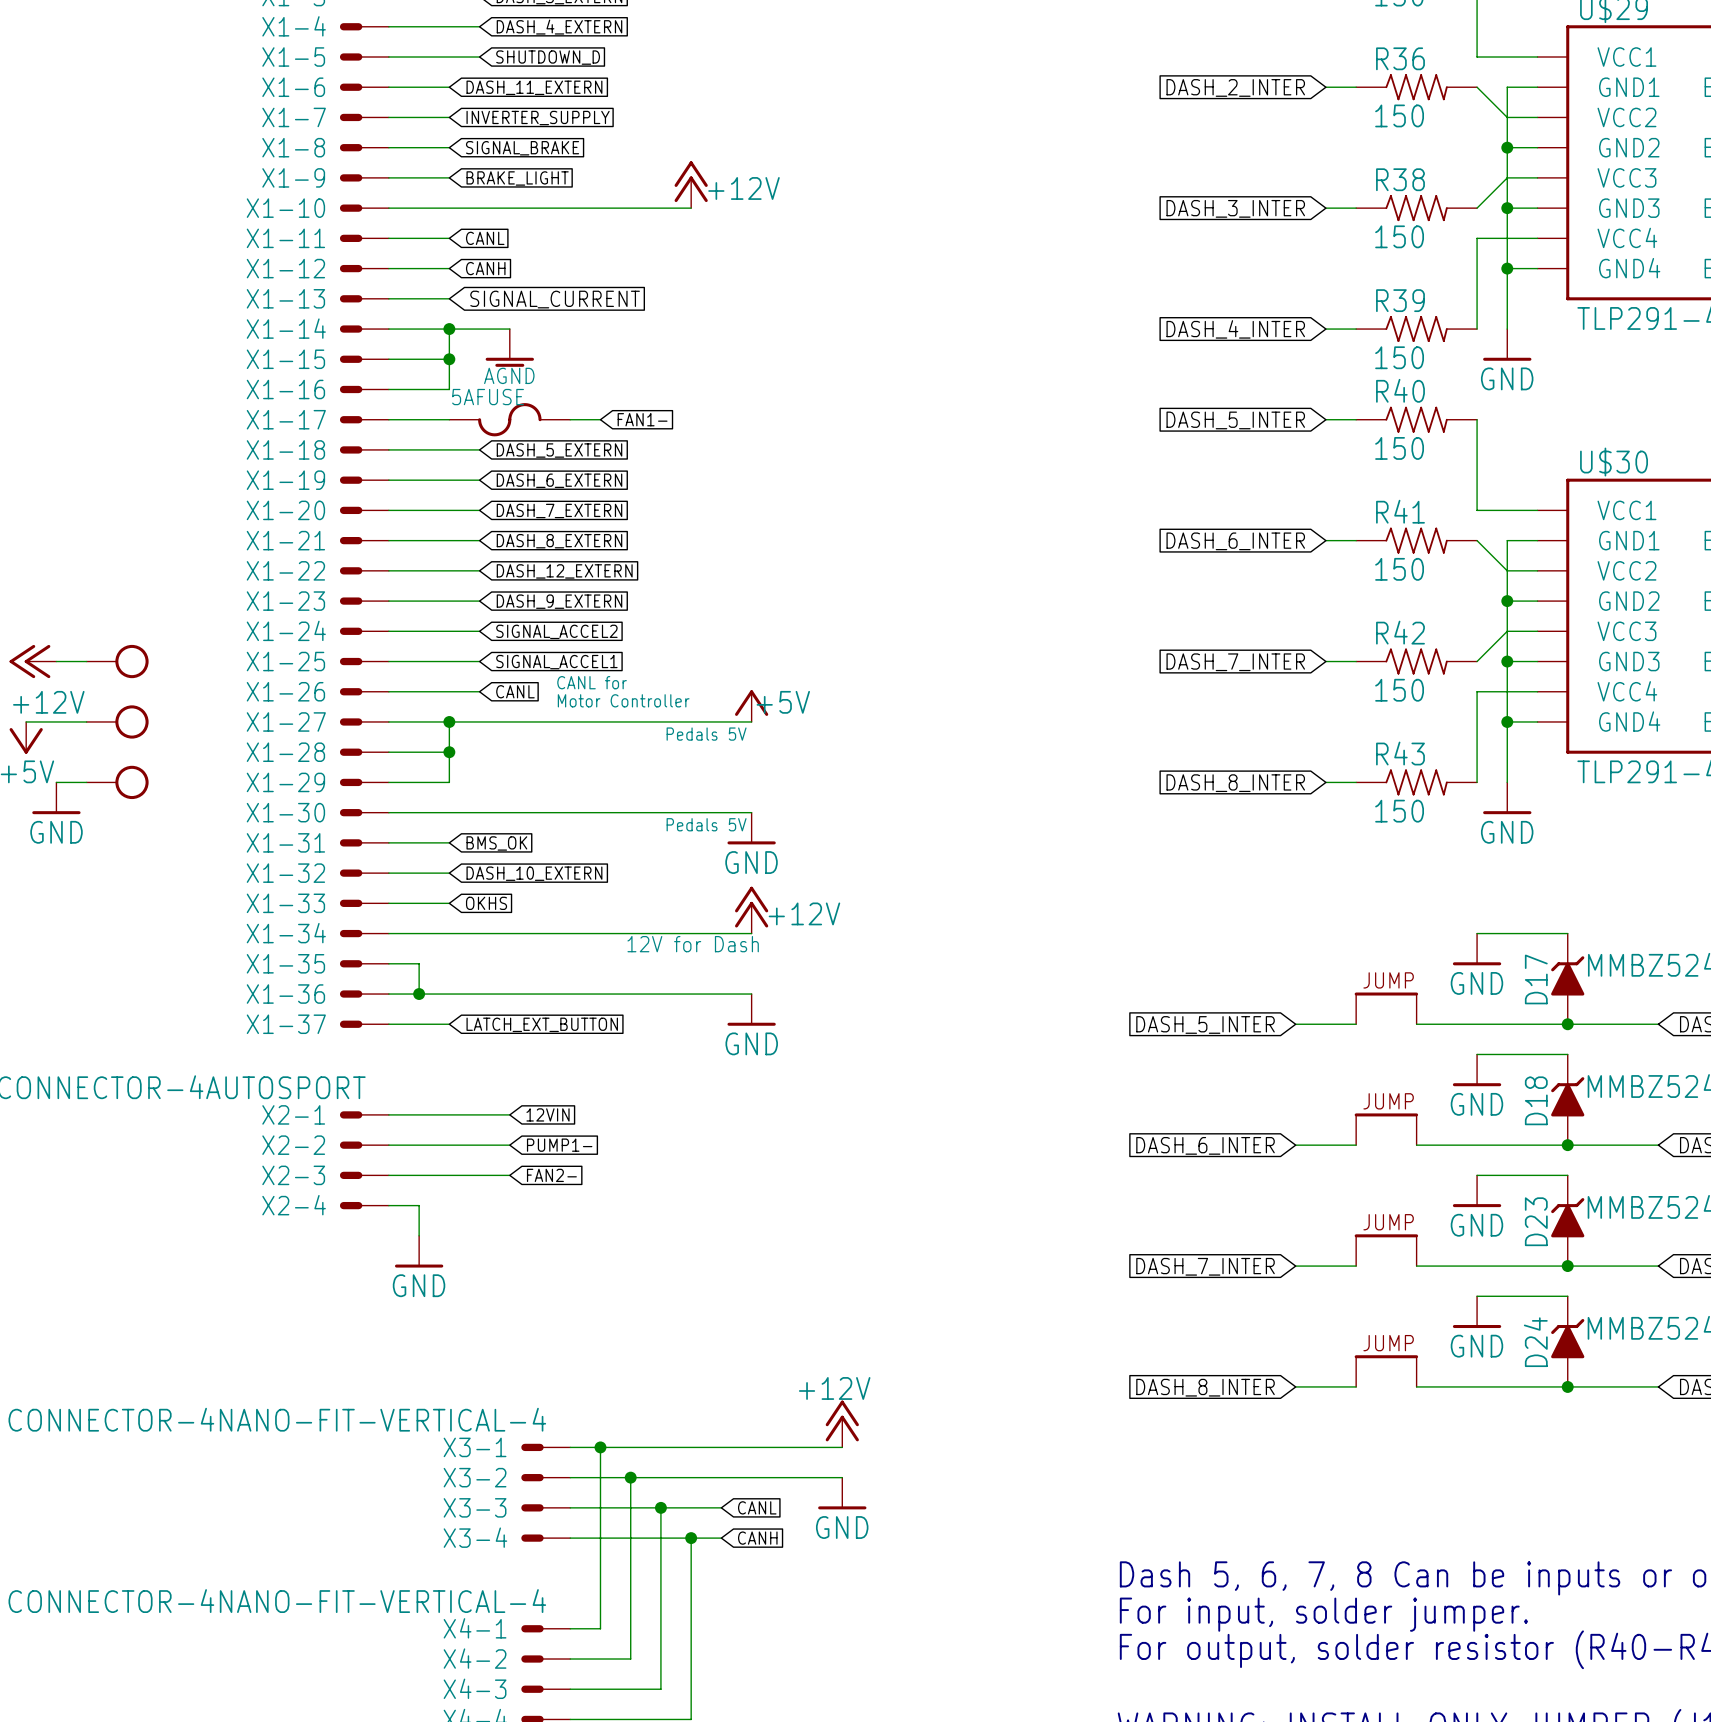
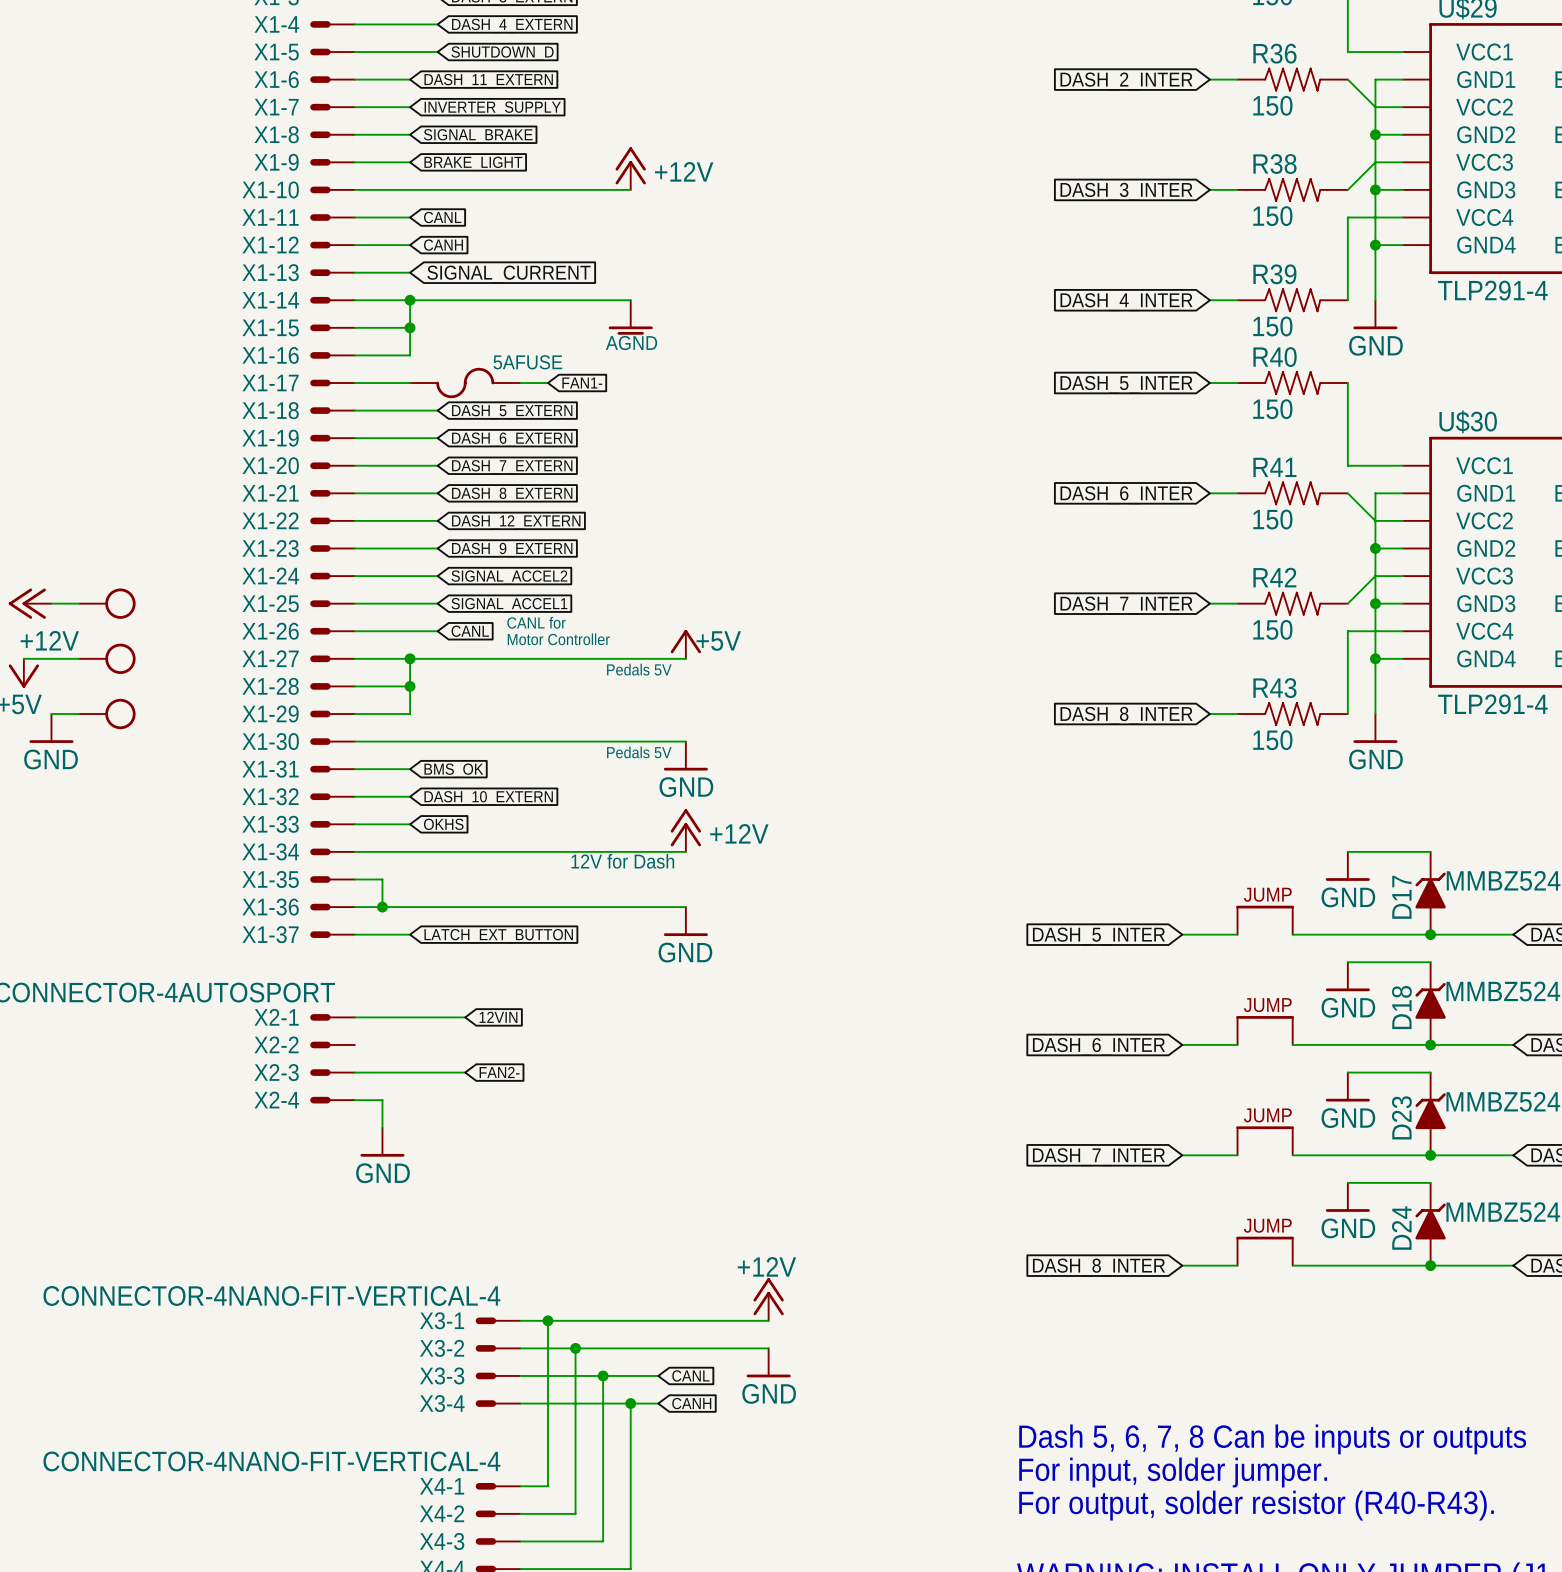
wire: none -> (465, 300) (630, 300)
power symbol position: AGND (509, 347) -> AGND (630, 317)
5AFUSE name position: 5AFUSE (488, 397) -> 5AFUSE (527, 362)
wire: (388, 1145) (509, 1145) -> none
global label: PUMP1- (559, 1145) -> none

